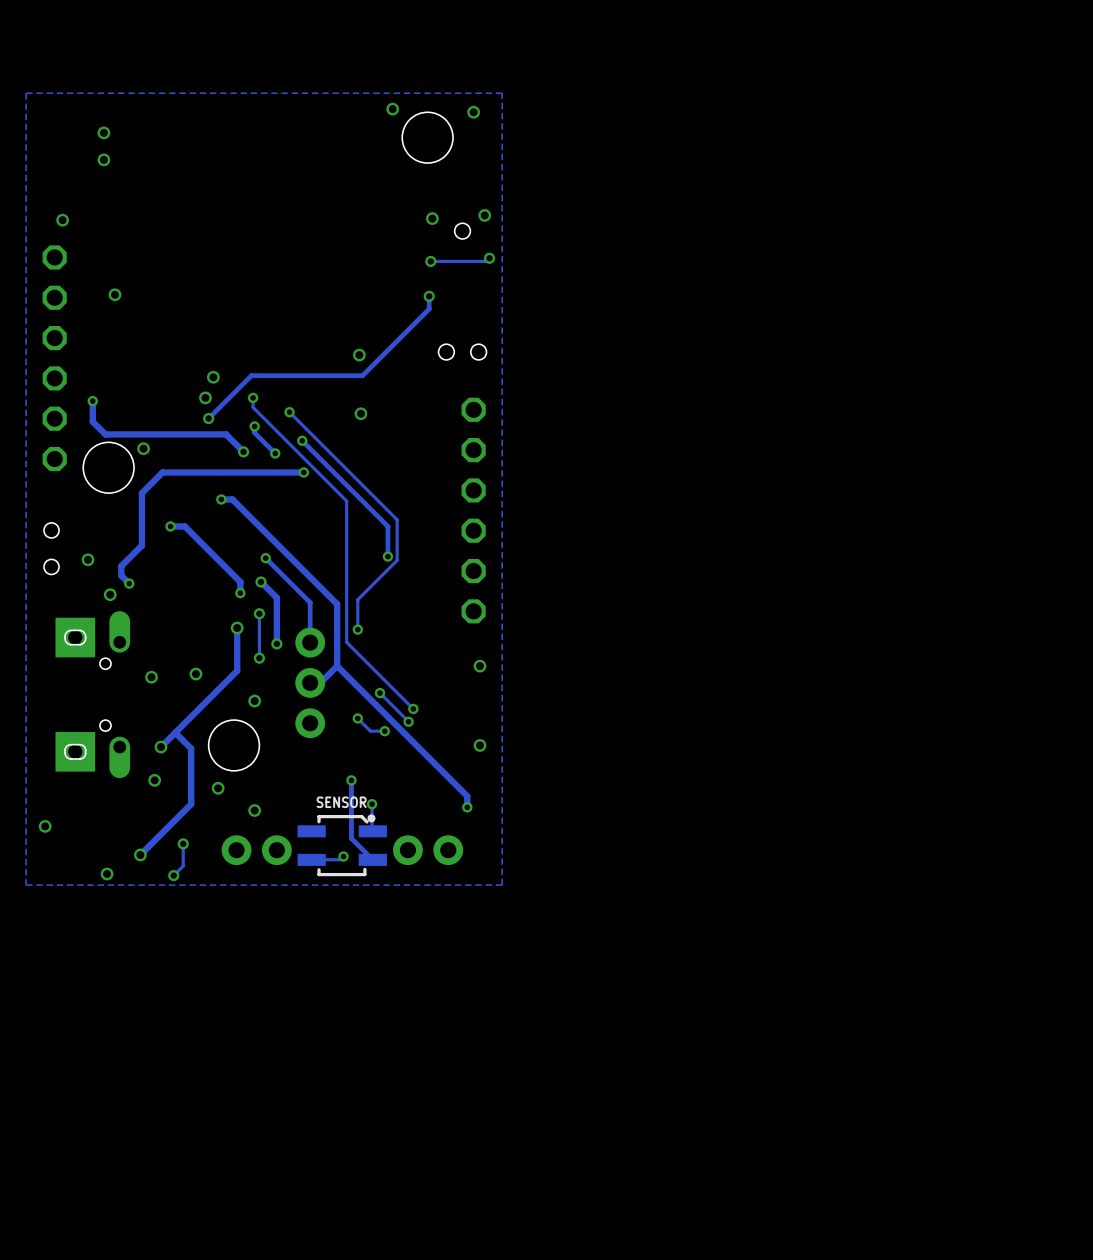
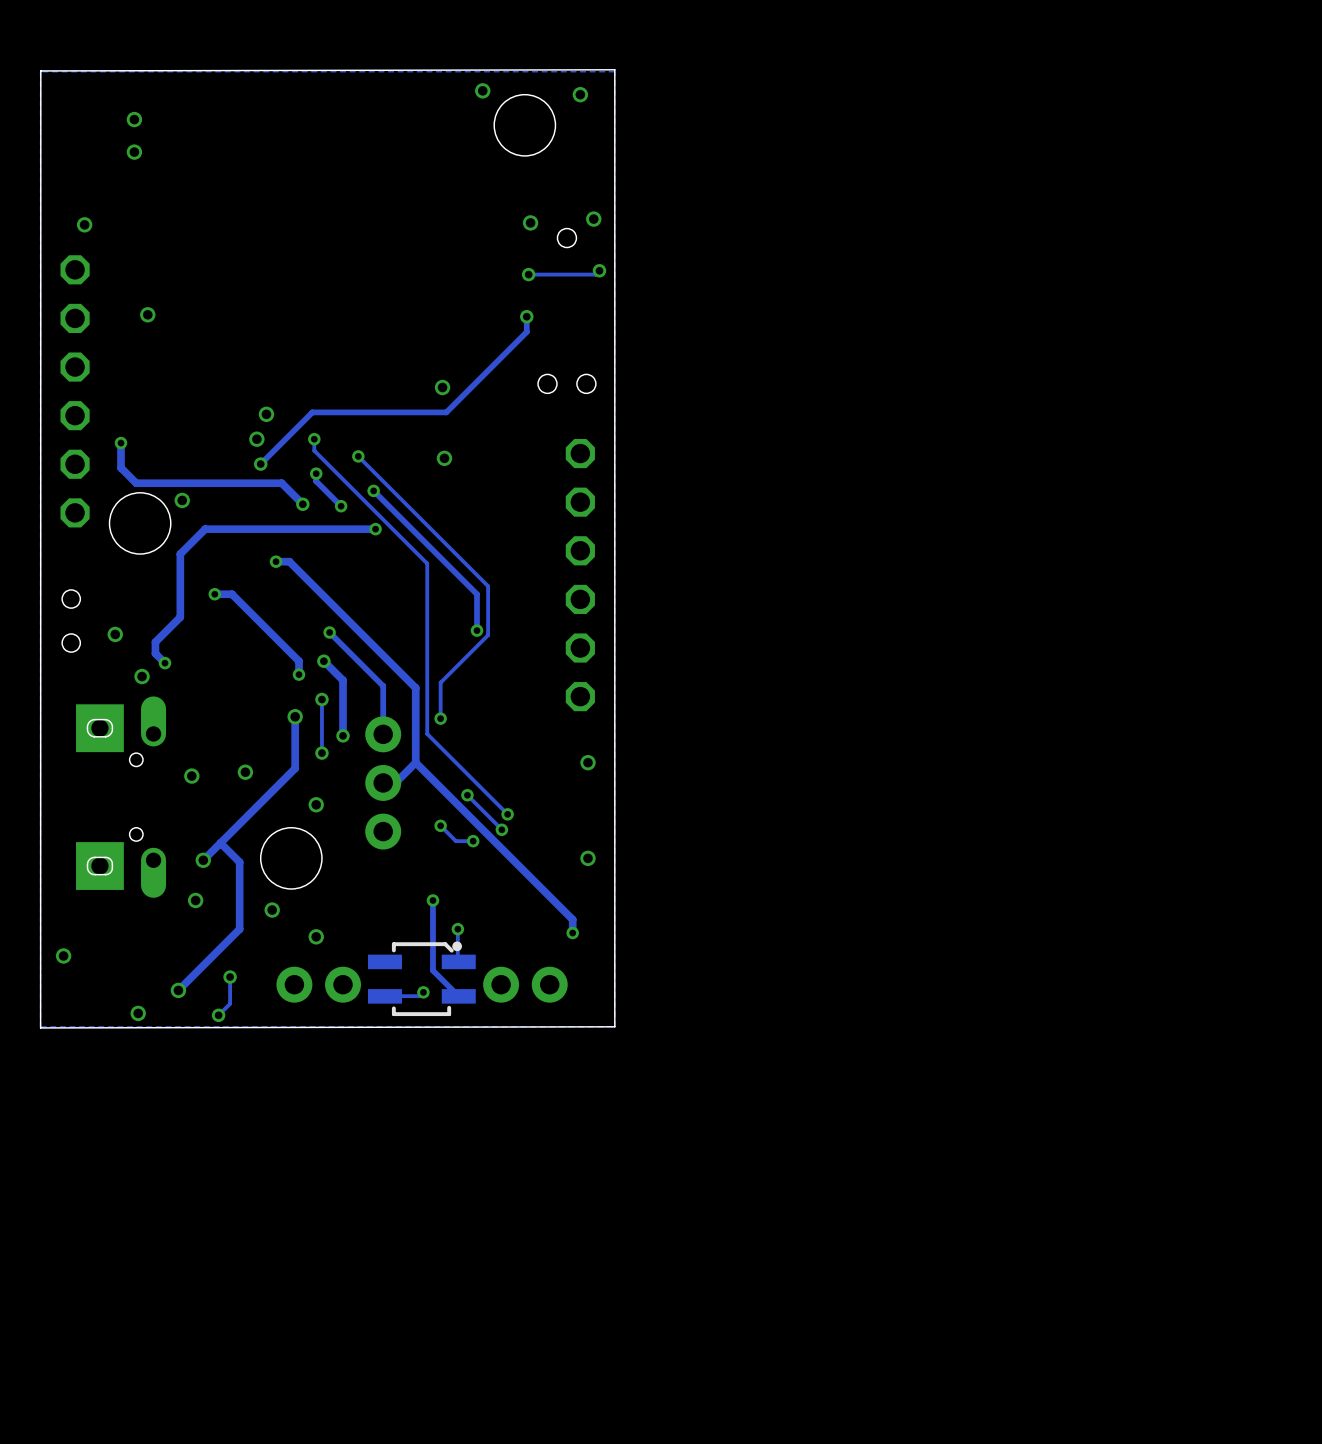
board edge: none -> (614, 69) (40, 70) (40, 1027) (614, 1026) (614, 69)
SENSOR name: SENSOR (341, 802) -> none

